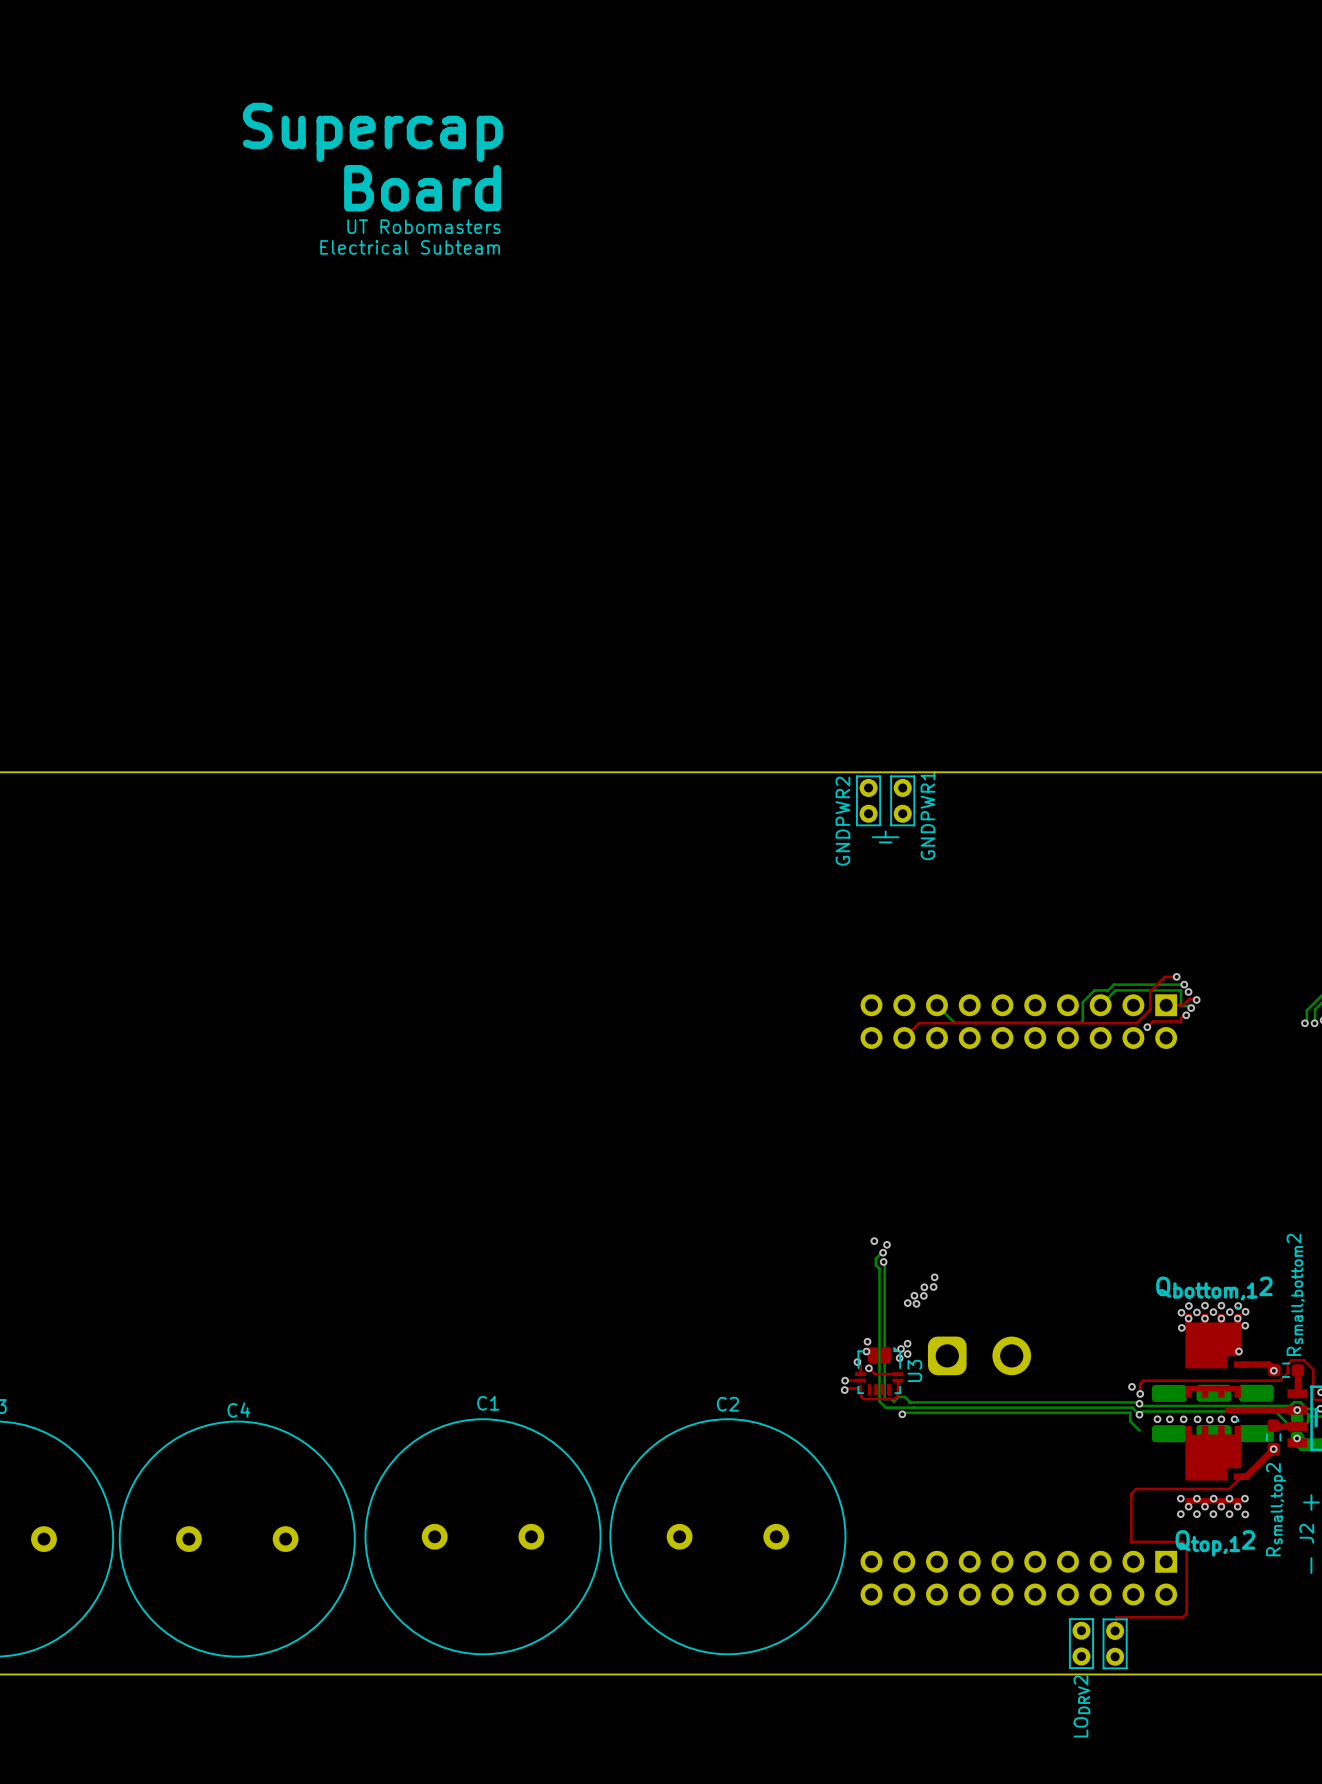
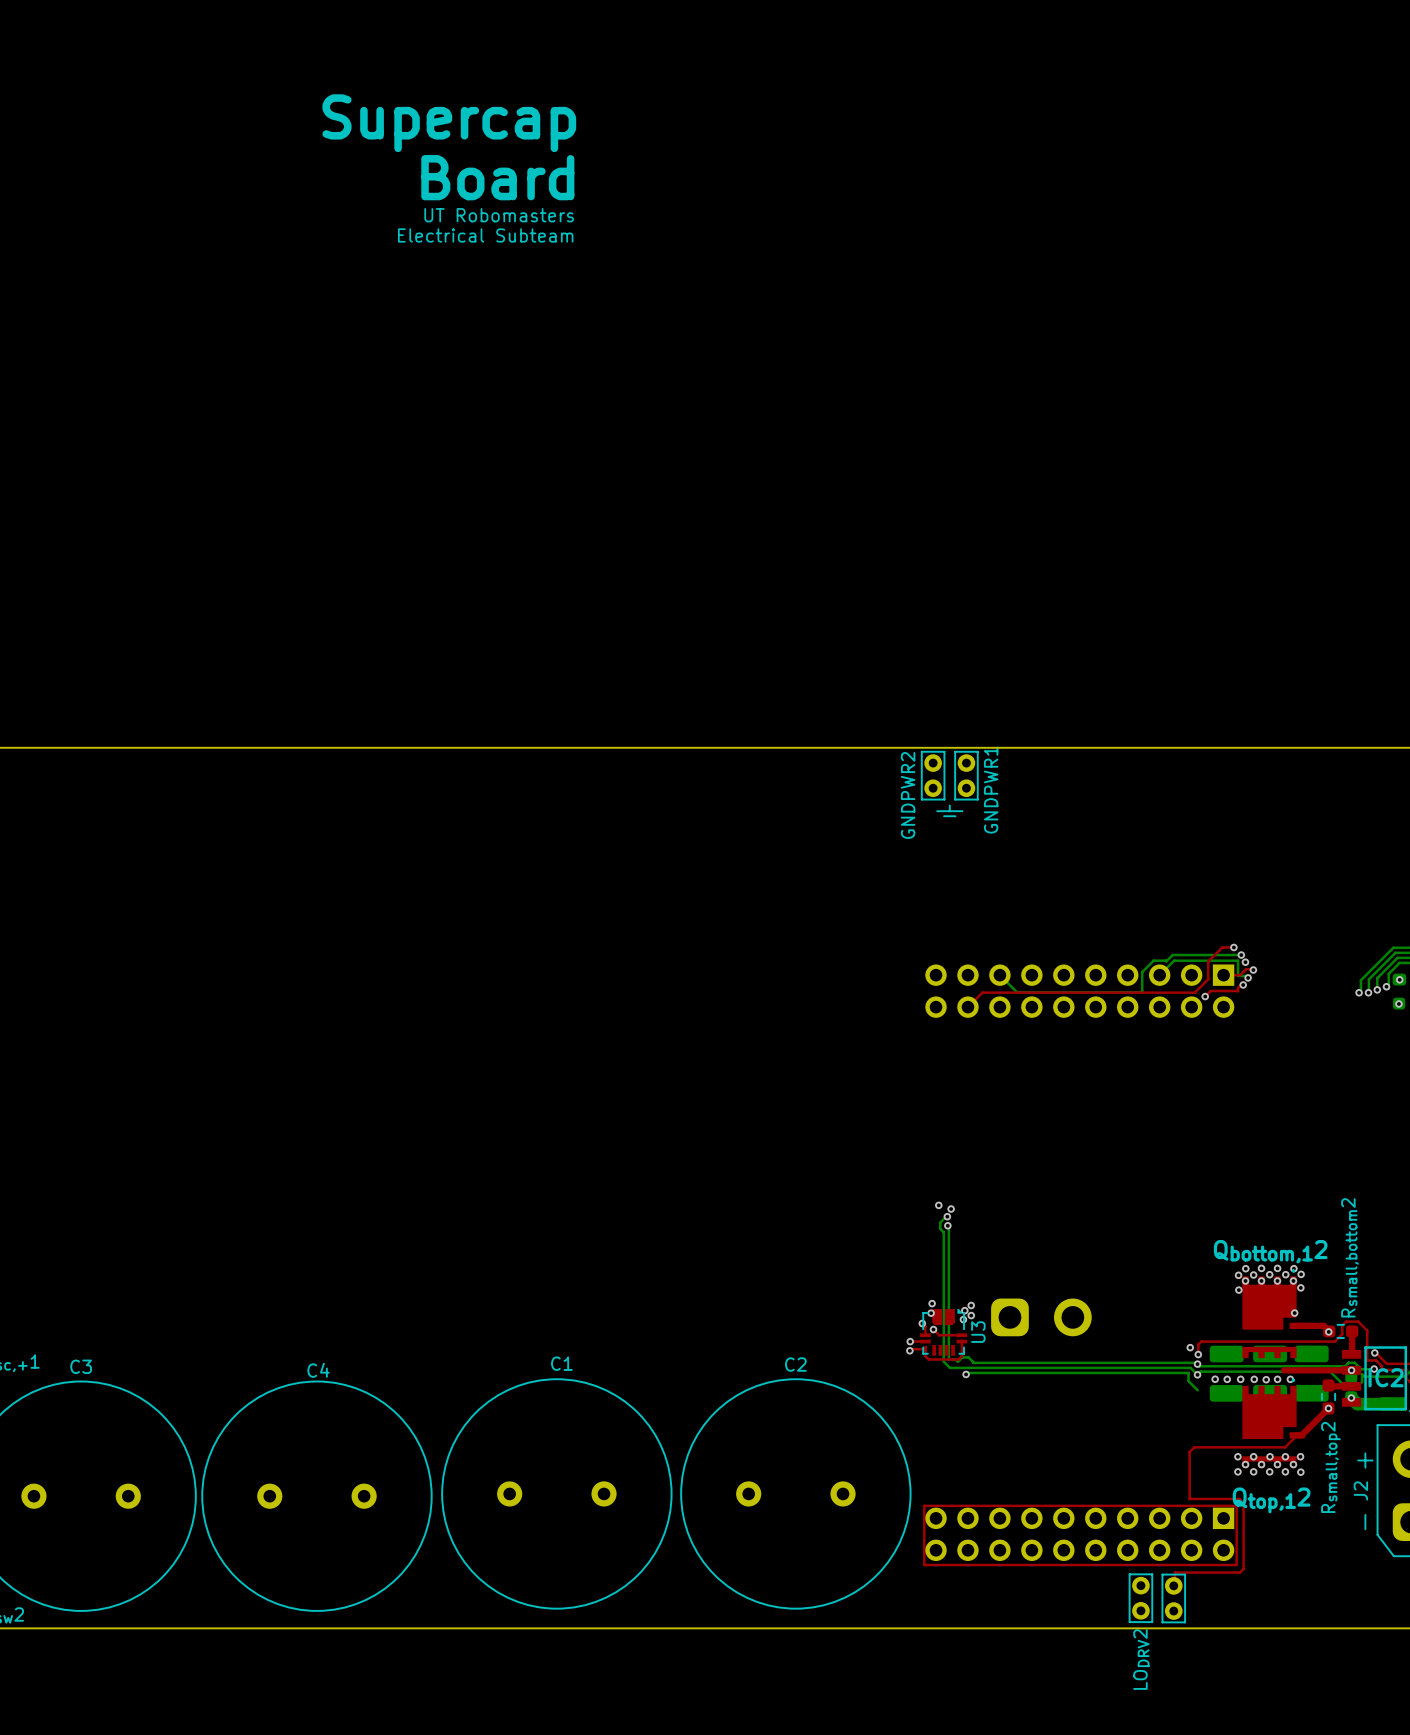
via: (934, 1277) -> none
via: (933, 1286) -> none
via: (924, 1287) -> none
via: (914, 1295) -> none
via: (923, 1295) -> none
via: (907, 1303) -> none
via: (916, 1303) -> none
top track: none -> (924, 1505) (1236, 1505) (1236, 1565) (924, 1565) (924, 1505)

